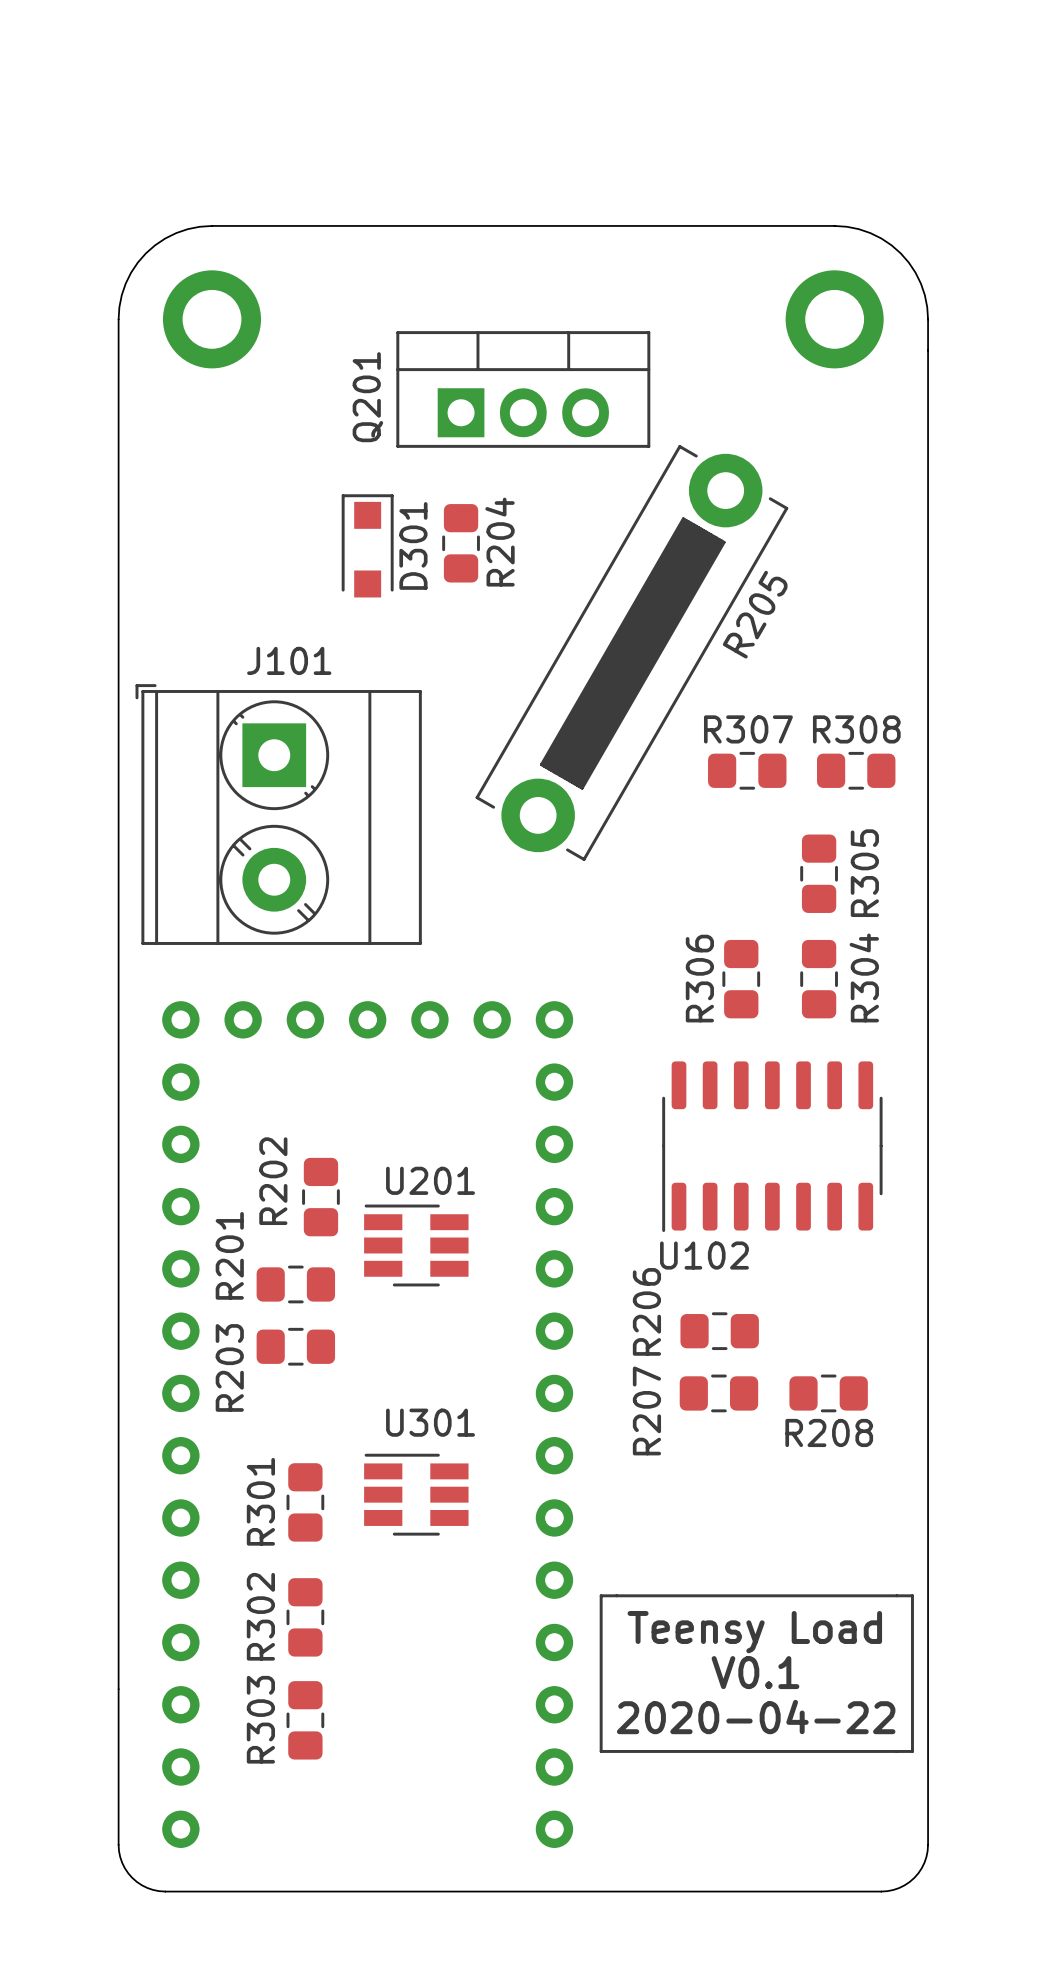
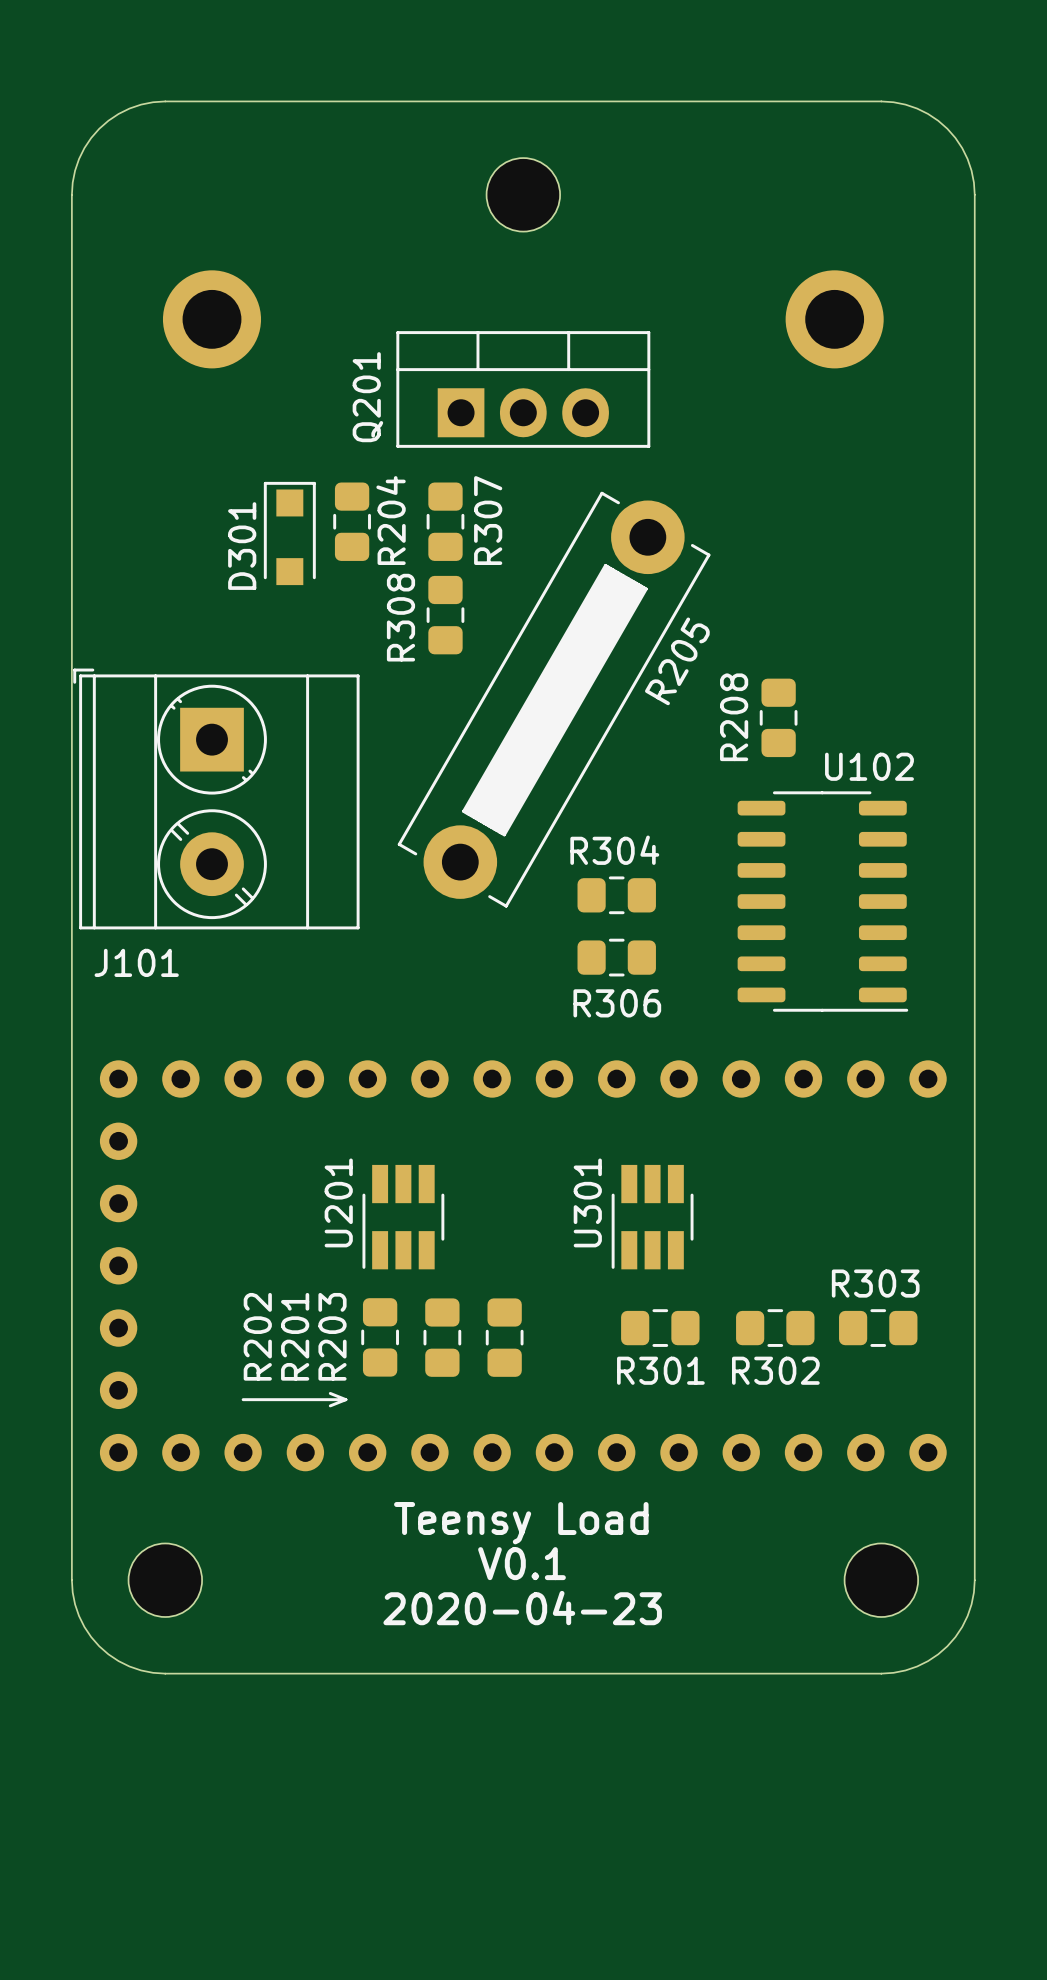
part: none -> (523, 194)
board edge: (212, 225) (846, 226) (870, 233) (891, 245) (908, 262) (920, 283) (927, 307) (928, 319) (928, 1844) (926, 1856) (921, 1868) (909, 1881) (899, 1888) (881, 1891) (165, 1891) (153, 1889) (141, 1885) (132, 1877) (122, 1862) (118, 1844) (118, 319) (119, 307) (125, 283) (131, 272) (145, 253) (155, 245) (176, 233) (187, 229) (212, 225) -> (165, 101) (141, 104) (129, 108) (108, 120) (99, 128) (84, 148) (79, 159) (72, 182) (71, 194) (71, 1580) (72, 1592) (79, 1615) (84, 1626) (99, 1646) (118, 1661) (141, 1670) (165, 1673) (881, 1673) (893, 1672) (917, 1666) (928, 1661) (947, 1646) (962, 1626) (971, 1604) (974, 1580) (974, 194) (973, 182) (967, 159) (955, 137) (938, 120) (917, 108) (893, 102) (165, 101)
R204 position: (461, 543) -> (352, 521)
D301 position: (367, 545) -> (289, 533)
D301 name position: D301 (413, 545) -> D301 (242, 546)
R205 position: (631, 652) -> (554, 699)
J101 name position: J101 (289, 660) -> J101 (136, 962)
R308 name position: R308 (856, 729) -> R308 (400, 617)
R307 rotation: 0° (747, 770) -> 90° clockwise (445, 521)
R307 position: (747, 770) -> (445, 521)
R308 rotation: 0° (856, 770) -> 90° clockwise (445, 615)
R308 position: (856, 770) -> (445, 615)
J101 position: (278, 814) -> (216, 798)
R305: (819, 873) -> none
R304 name position: R304 (864, 977) -> R304 (614, 850)
R306 name position: R306 (699, 978) -> R306 (617, 1003)
R306 rotation: 0° (741, 979) -> 90° clockwise (616, 957)
R306 position: (741, 979) -> (616, 957)
R304 rotation: 0° (819, 979) -> 90° clockwise (616, 895)
R304 position: (819, 979) -> (616, 895)
U102 rotation: 0° (772, 1146) -> 90° counterclockwise (822, 901)
U102 position: (772, 1146) -> (822, 901)
R202 name position: R202 (273, 1181) -> R202 (257, 1336)
R202 position: (320, 1197) -> (380, 1337)
U201 rotation: 0° (416, 1245) -> 90° counterclockwise (403, 1217)
R201 name position: R201 (229, 1255) -> R201 (295, 1336)
U102 name position: U102 (704, 1255) -> U102 (869, 766)
R201 rotation: 0° (295, 1284) -> 90° clockwise (442, 1337)
R201 position: (295, 1284) -> (442, 1337)
R206: (719, 1331) -> none
R203 rotation: 0° (295, 1346) -> 90° clockwise (504, 1337)
R203 position: (295, 1346) -> (504, 1337)
R203 name position: R203 (229, 1367) -> R203 (332, 1336)
line: none -> (330, 1393) (345, 1399)
R207: (718, 1393) -> none
R208 rotation: 0° (828, 1393) -> 90° clockwise (778, 717)
R208 position: (828, 1393) -> (778, 717)
line: none -> (243, 1399) (345, 1399)
line: none -> (345, 1399) (330, 1405)
part rotation: 0° (367, 1424) -> 90° counterclockwise (523, 1265)
U301 rotation: 0° (416, 1494) -> 90° counterclockwise (652, 1217)
U301 position: (416, 1494) -> (652, 1217)
R301 name position: R301 (260, 1501) -> R301 (660, 1370)
R301 rotation: 0° (305, 1502) -> 90° clockwise (660, 1328)
R301 position: (305, 1502) -> (660, 1328)
part: none -> (165, 1580)
part: none -> (881, 1580)
line: (601, 1595) (912, 1595) (912, 1751) (601, 1751) (601, 1595) -> none
text: none -> 2020-04-23 (522, 1608)
R302 name position: R302 (260, 1616) -> R302 (775, 1370)
R302 rotation: 0° (305, 1617) -> 90° clockwise (775, 1328)
R302 position: (305, 1617) -> (775, 1328)
text position: Teensy Load (754, 1632) -> Teensy Load (521, 1523)
text position: V0.1 (755, 1672) -> V0.1 (521, 1563)
text: 2020-04-22 (756, 1717) -> none
R303 rotation: 0° (305, 1720) -> 90° clockwise (878, 1328)
R303 position: (305, 1720) -> (878, 1328)

